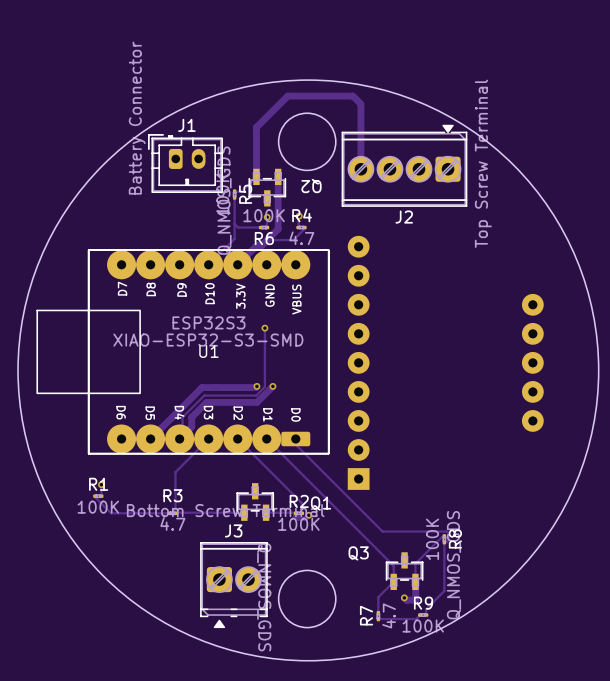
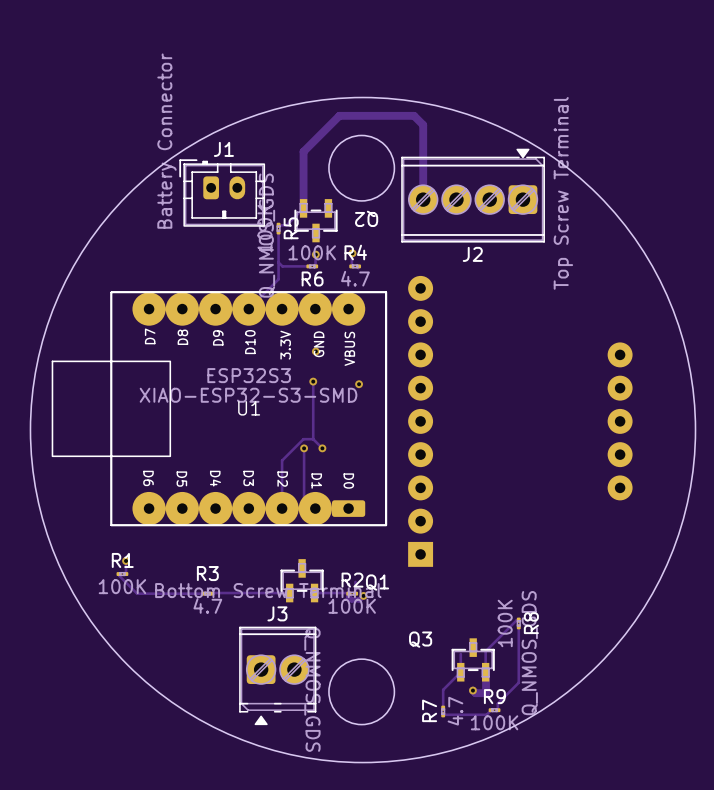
track: (278, 176) (278, 229) (261, 245) (257, 245) (237, 264) -> none
track: (304, 229) (293, 240) (267, 240) -> none
via: none -> (315, 351)
via: none -> (359, 384)
track: (264, 378) (264, 386) (256, 395) (204, 395) (182, 417) (182, 436) -> none
track: (256, 386) (202, 387) (150, 439) -> (304, 448) (304, 497) (312, 505)
track: (272, 386) (256, 402) (206, 402) (191, 417) (191, 426) (179, 439) (171, 430) -> (322, 448) (313, 439) (303, 439) (282, 460) (282, 504)
track: (208, 439) (175, 472) (175, 513) -> none
track: (237, 439) (301, 503) -> none
track: (266, 439) (393, 565) -> none
track: (295, 444) (382, 531) (446, 531) (448, 533) (448, 540) (444, 542) -> none

